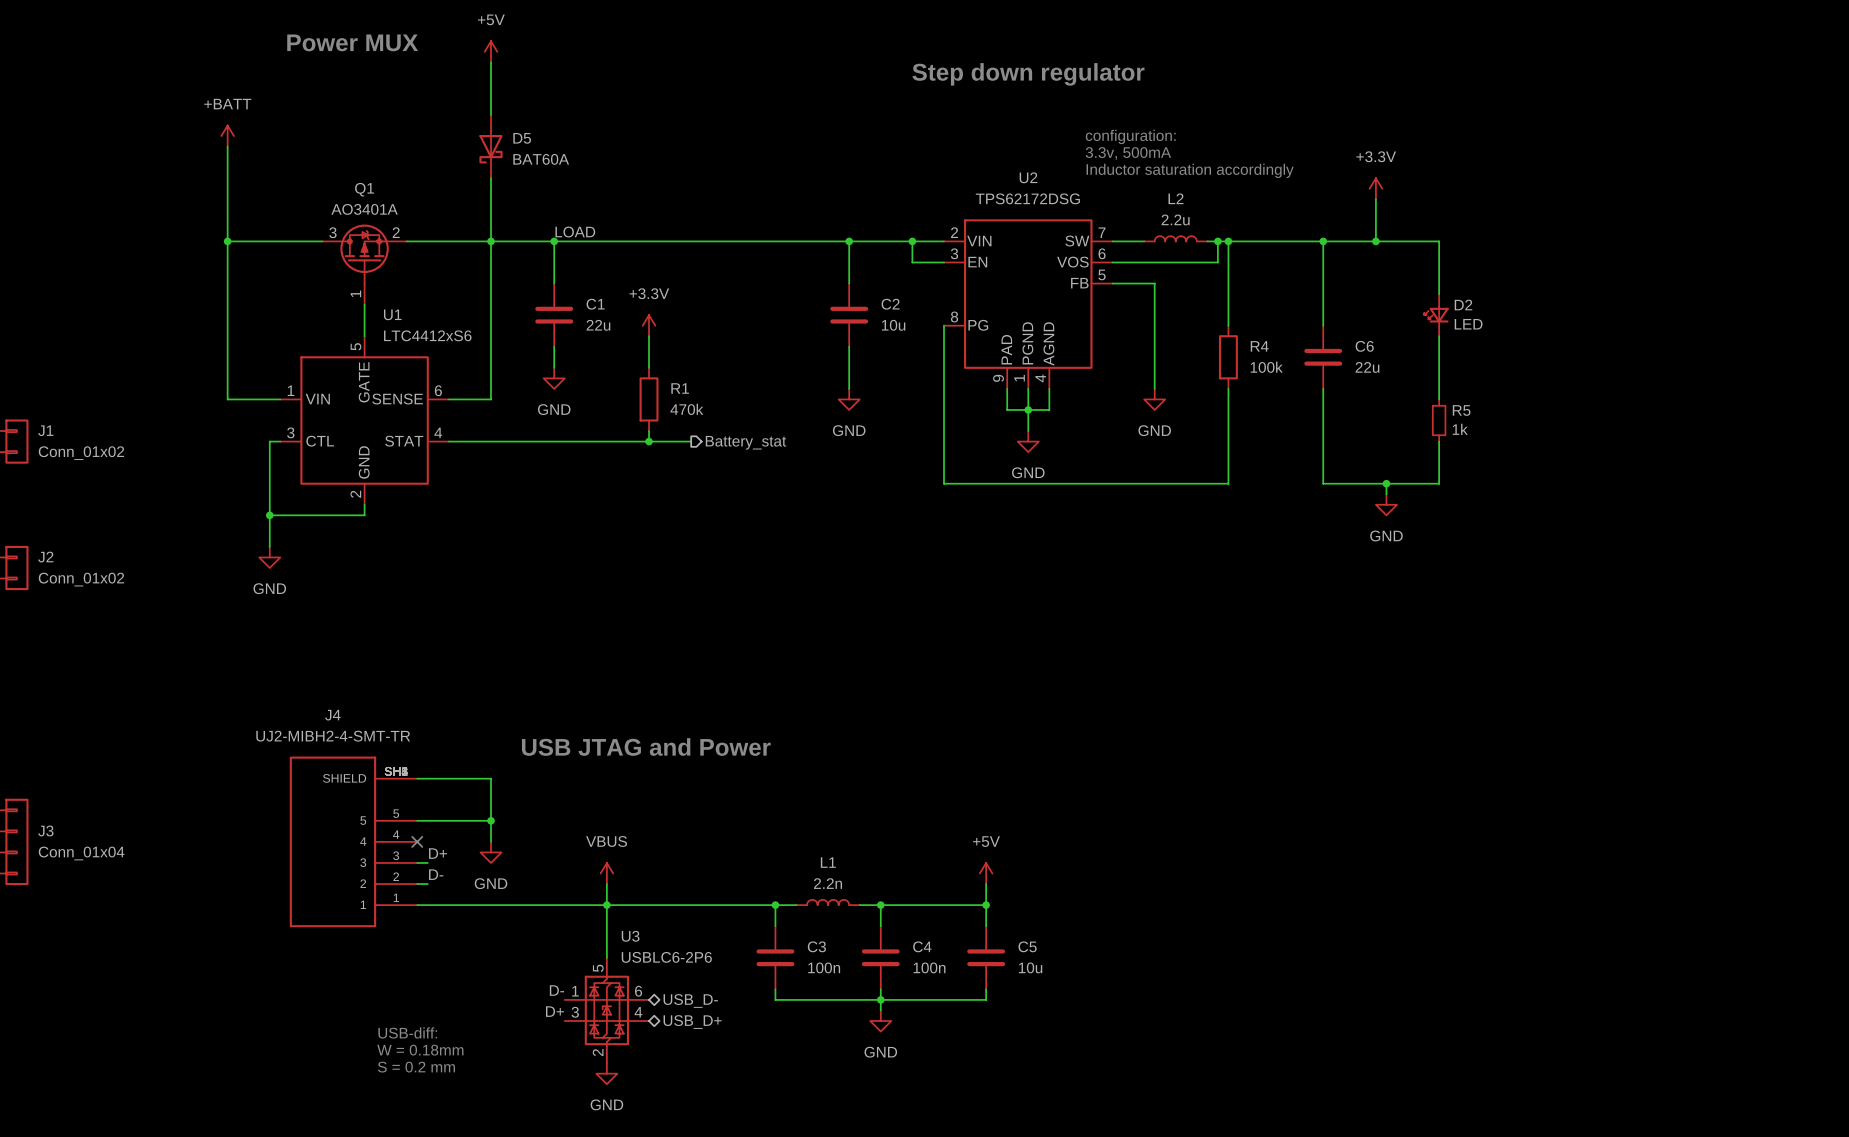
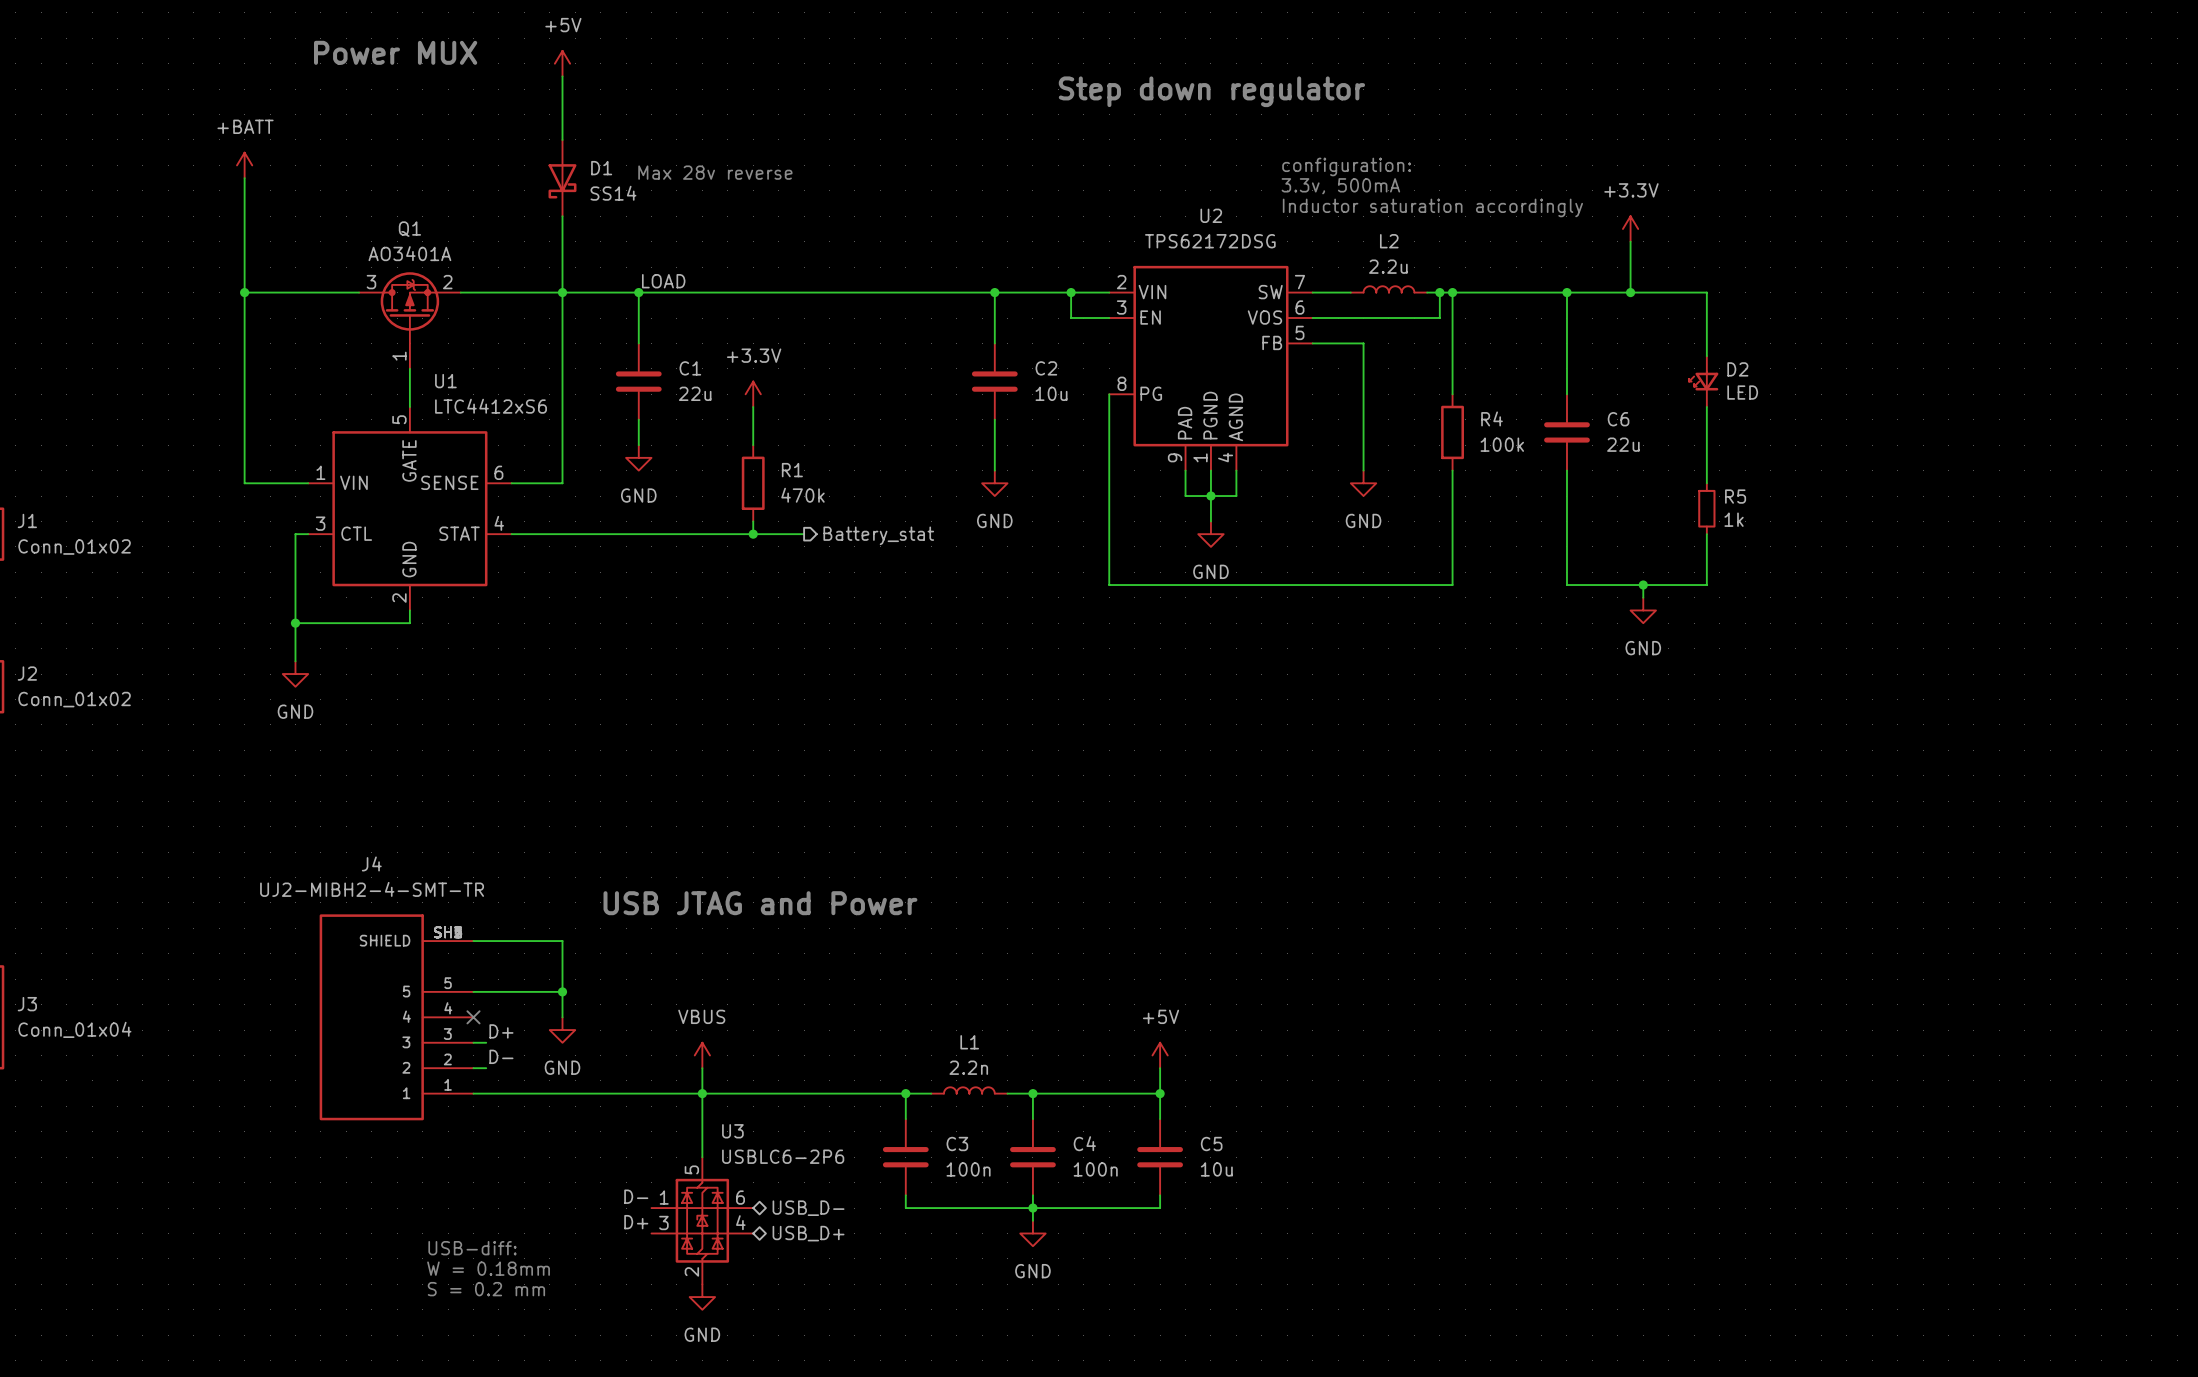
D5 name: D5 (522, 138) -> D1 (601, 168)
text: none -> Max 28v reverse (715, 172)
D5 value: BAT60A (541, 159) -> SS14 (613, 193)

